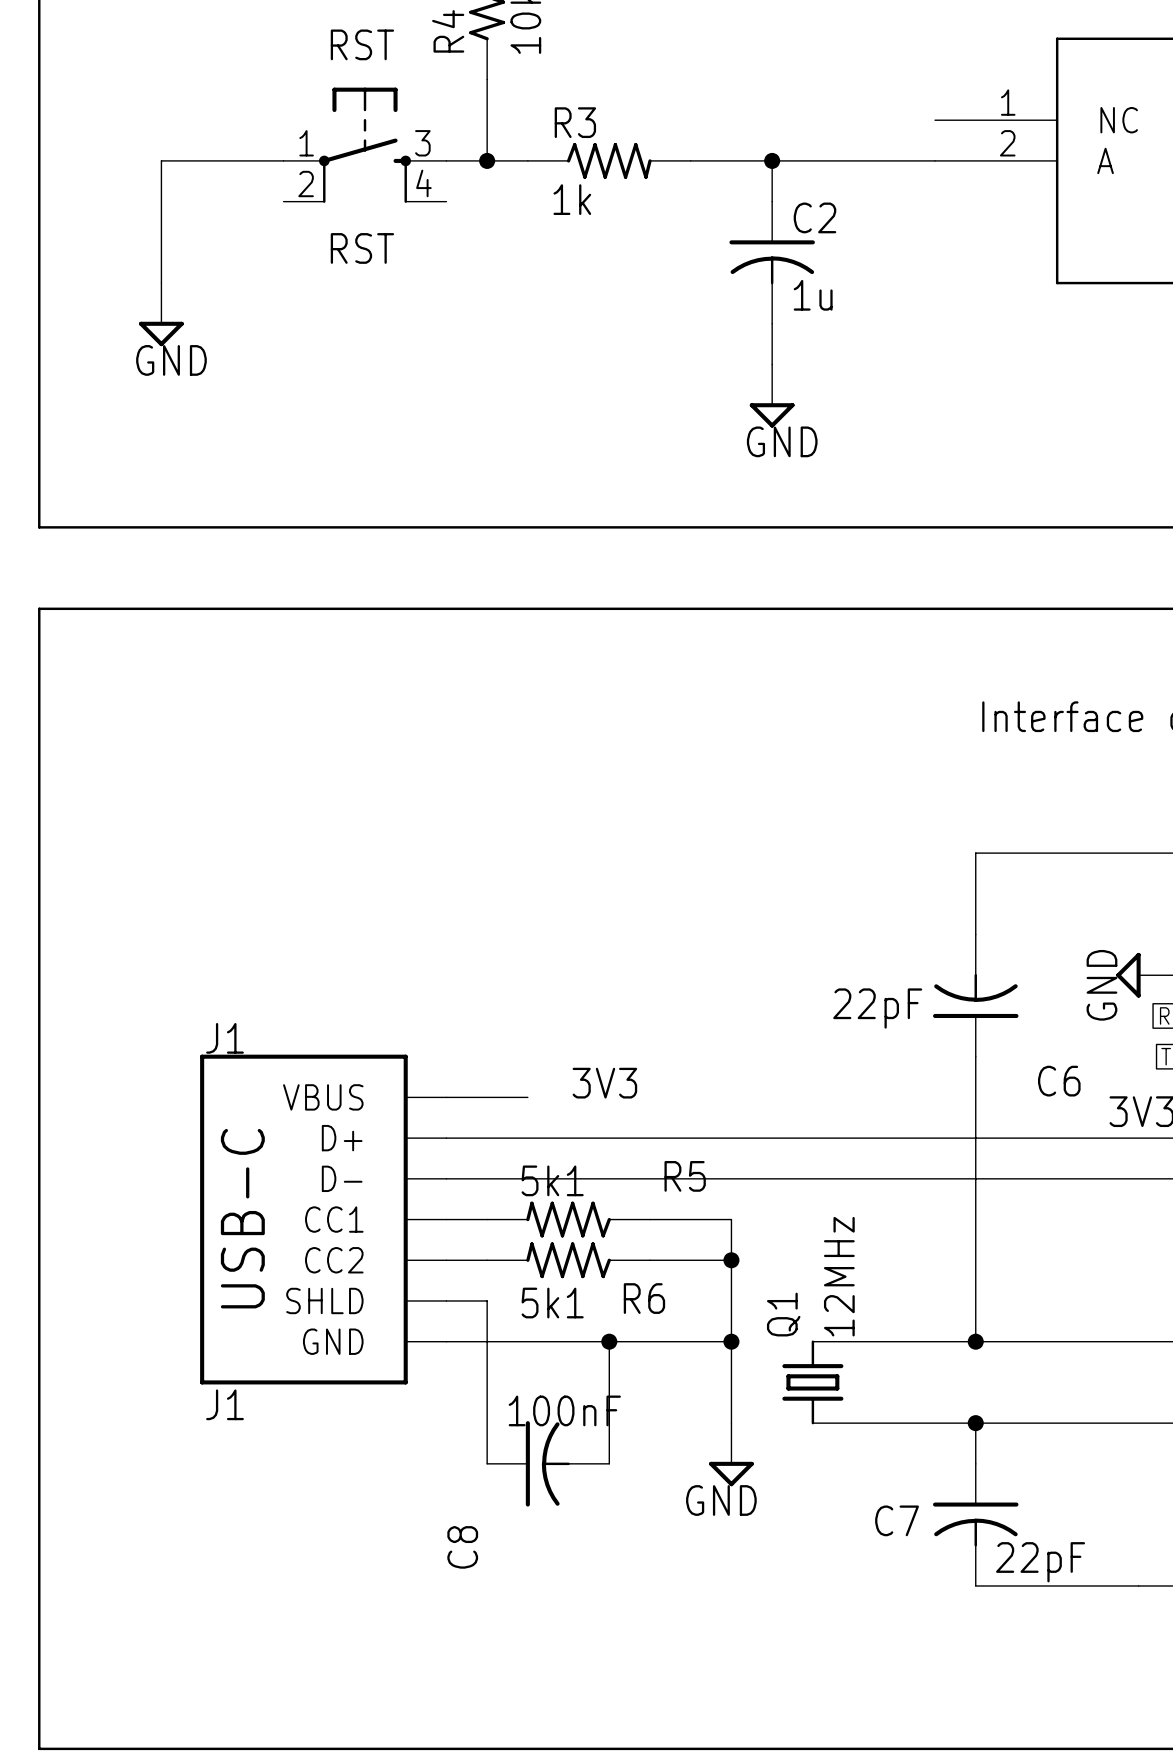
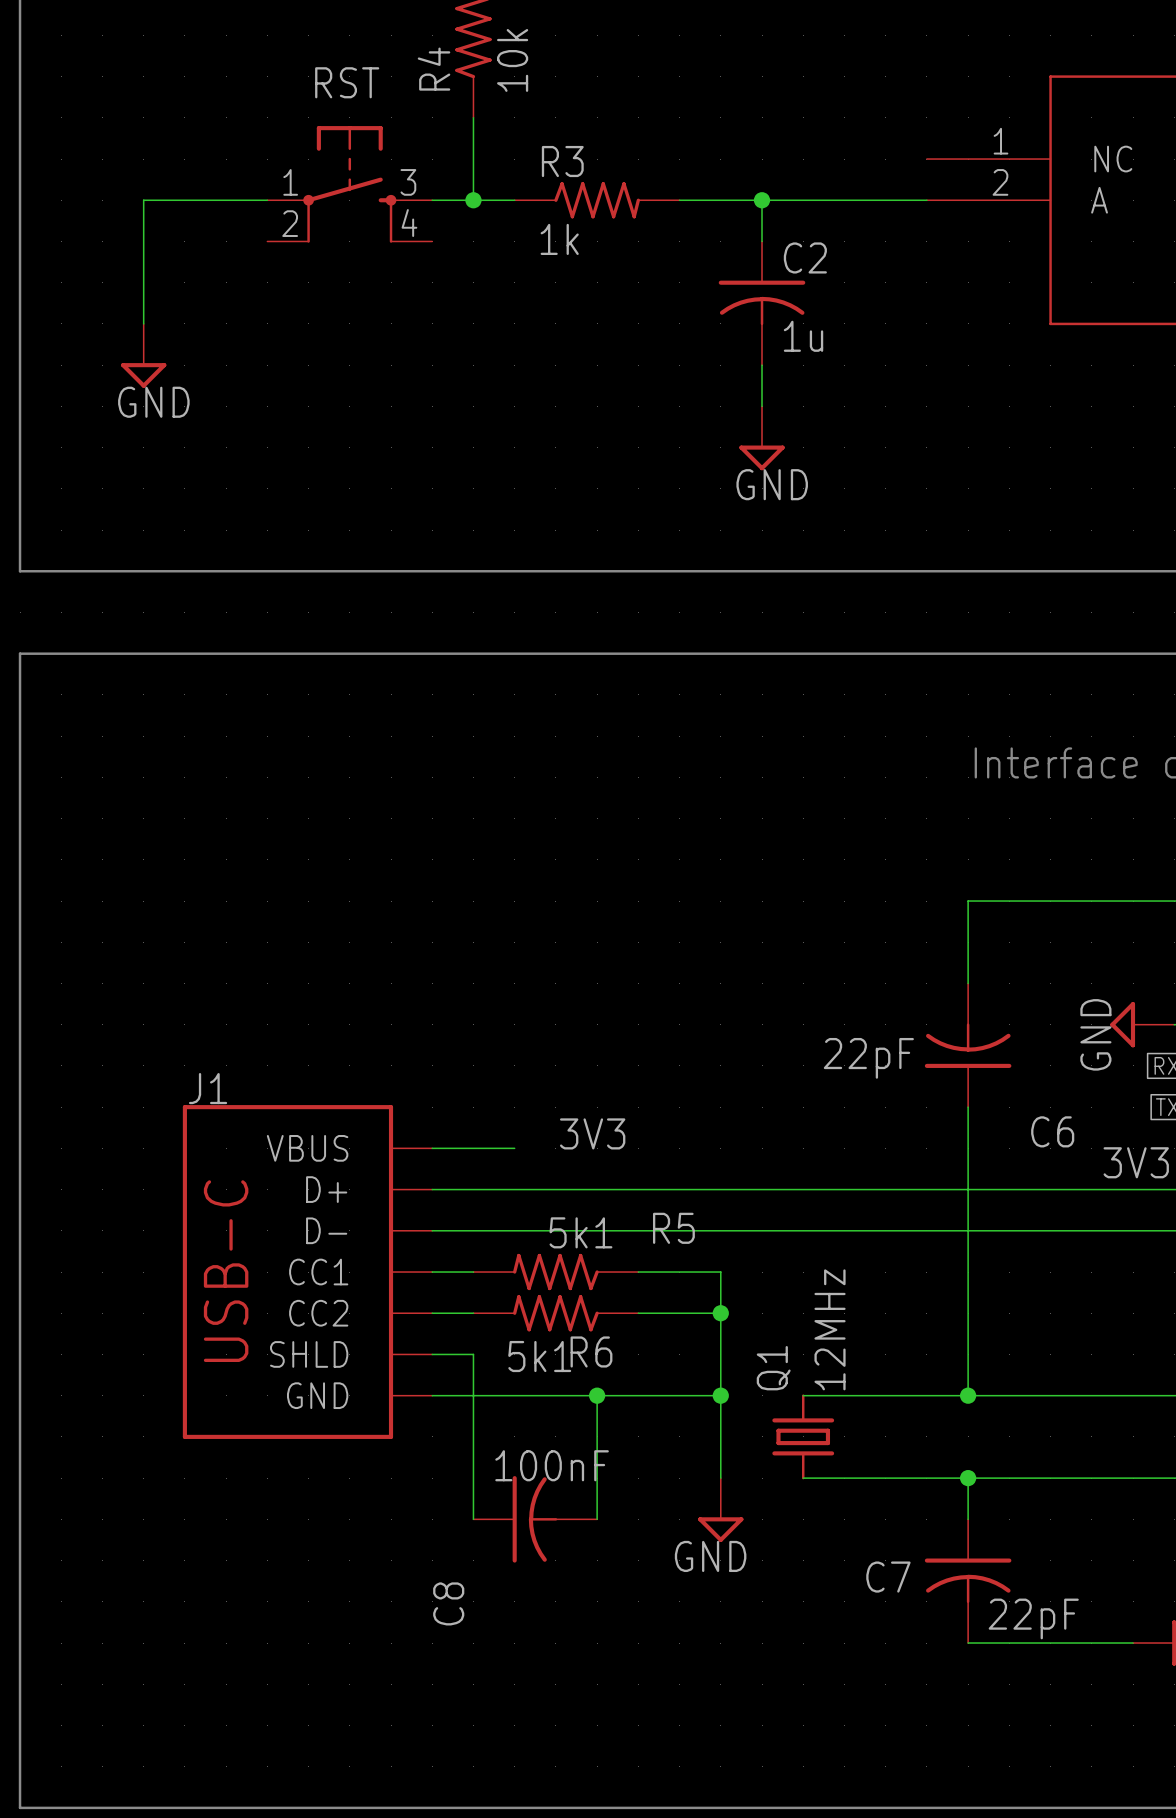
RST value: RST (362, 248) -> none
R5 value position: 5k1 (552, 1180) -> 5k1 (580, 1232)
R6 name position: R6 (644, 1298) -> R6 (591, 1351)
J1 value: J1 (225, 1404) -> none

